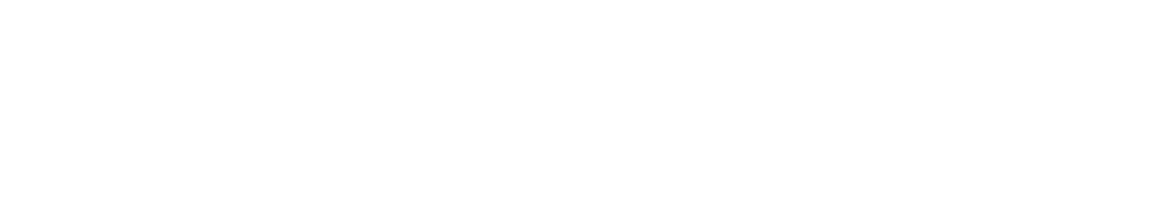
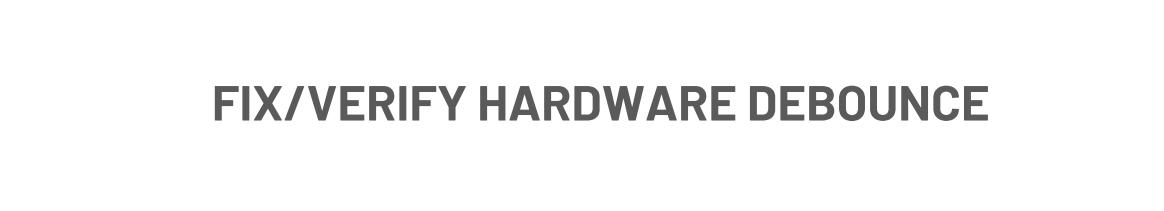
text: none -> FIX/VERIFY HARDWARE DEBOUNCE (601, 103)

